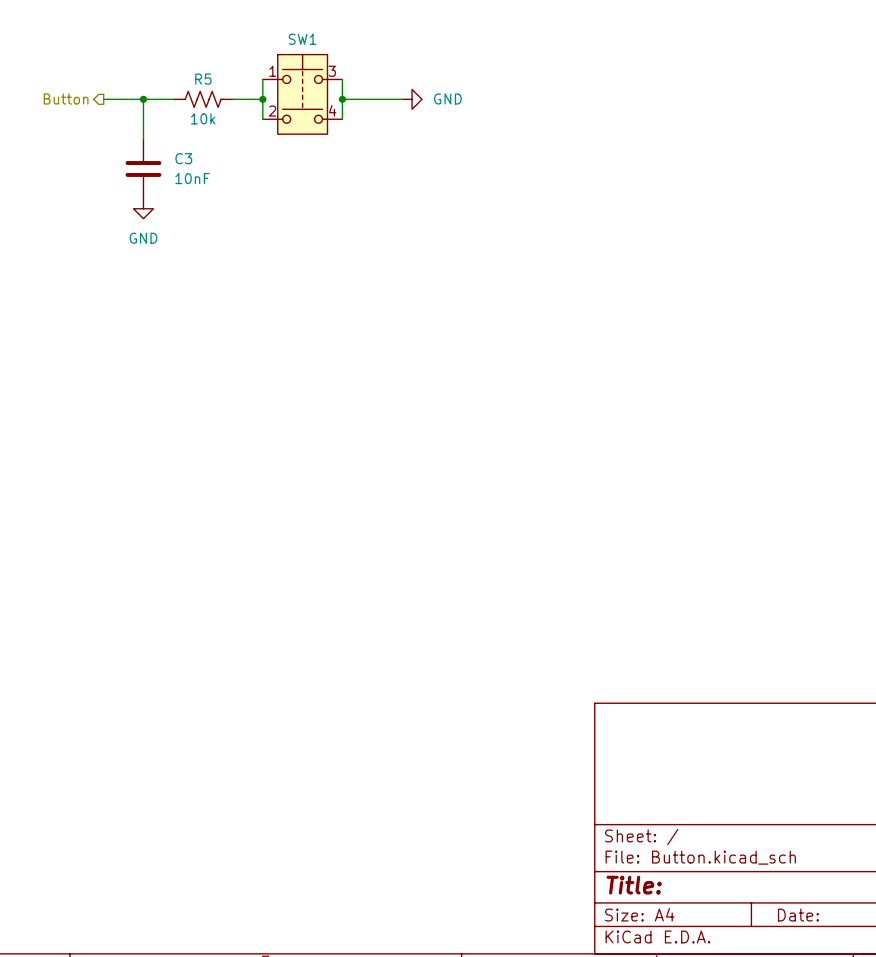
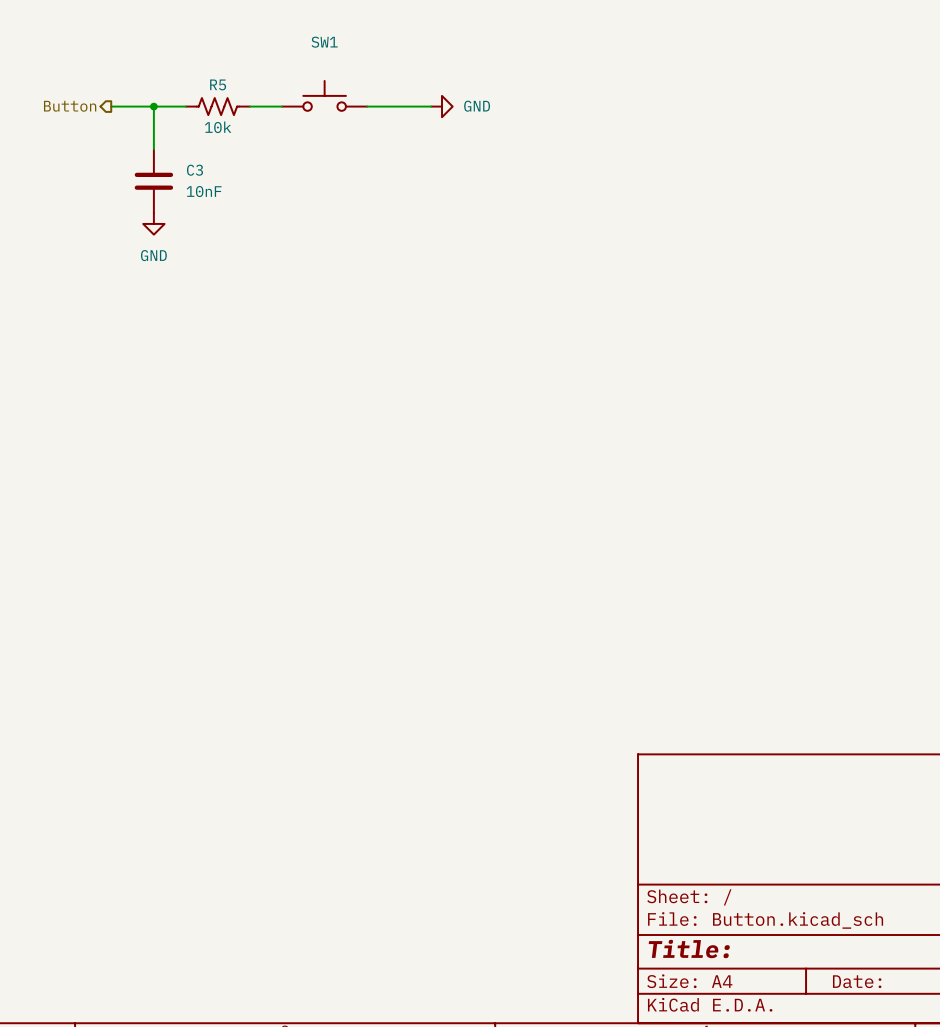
SW1 symbol: [262, 54, 343, 135] -> [281, 80, 368, 111]
wire: (262, 79) (262, 119) -> none
wire: (342, 79) (342, 119) -> none
junction: (262, 99) -> none
junction: (342, 99) -> none

